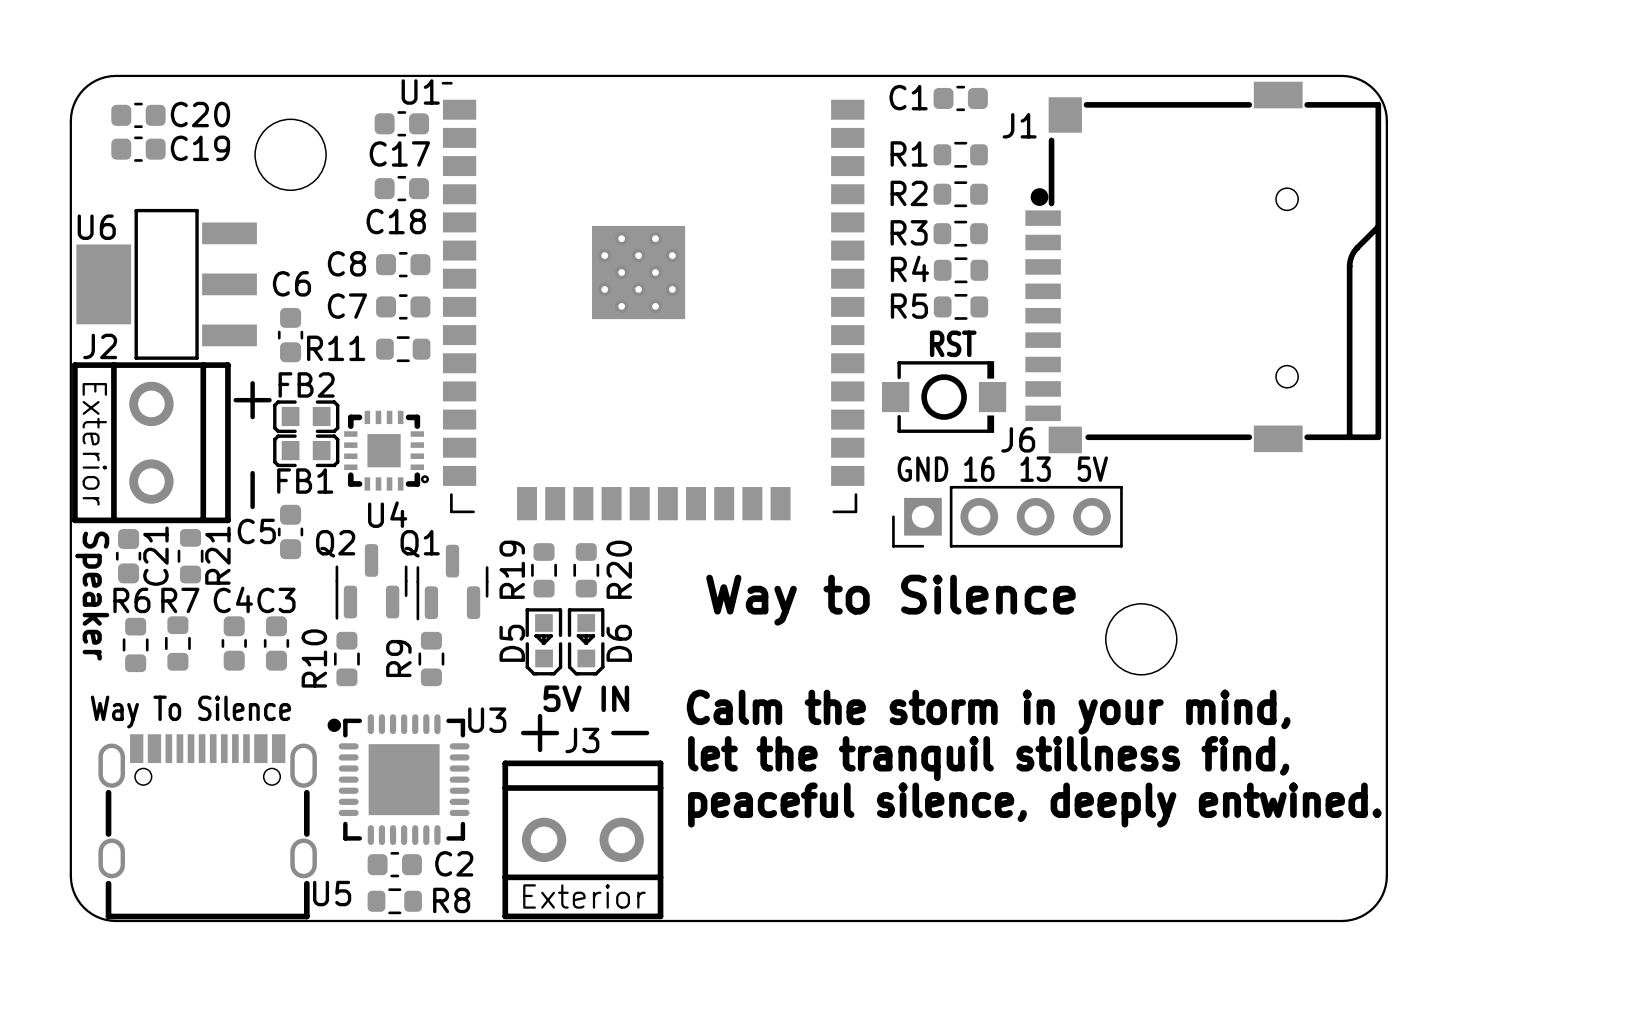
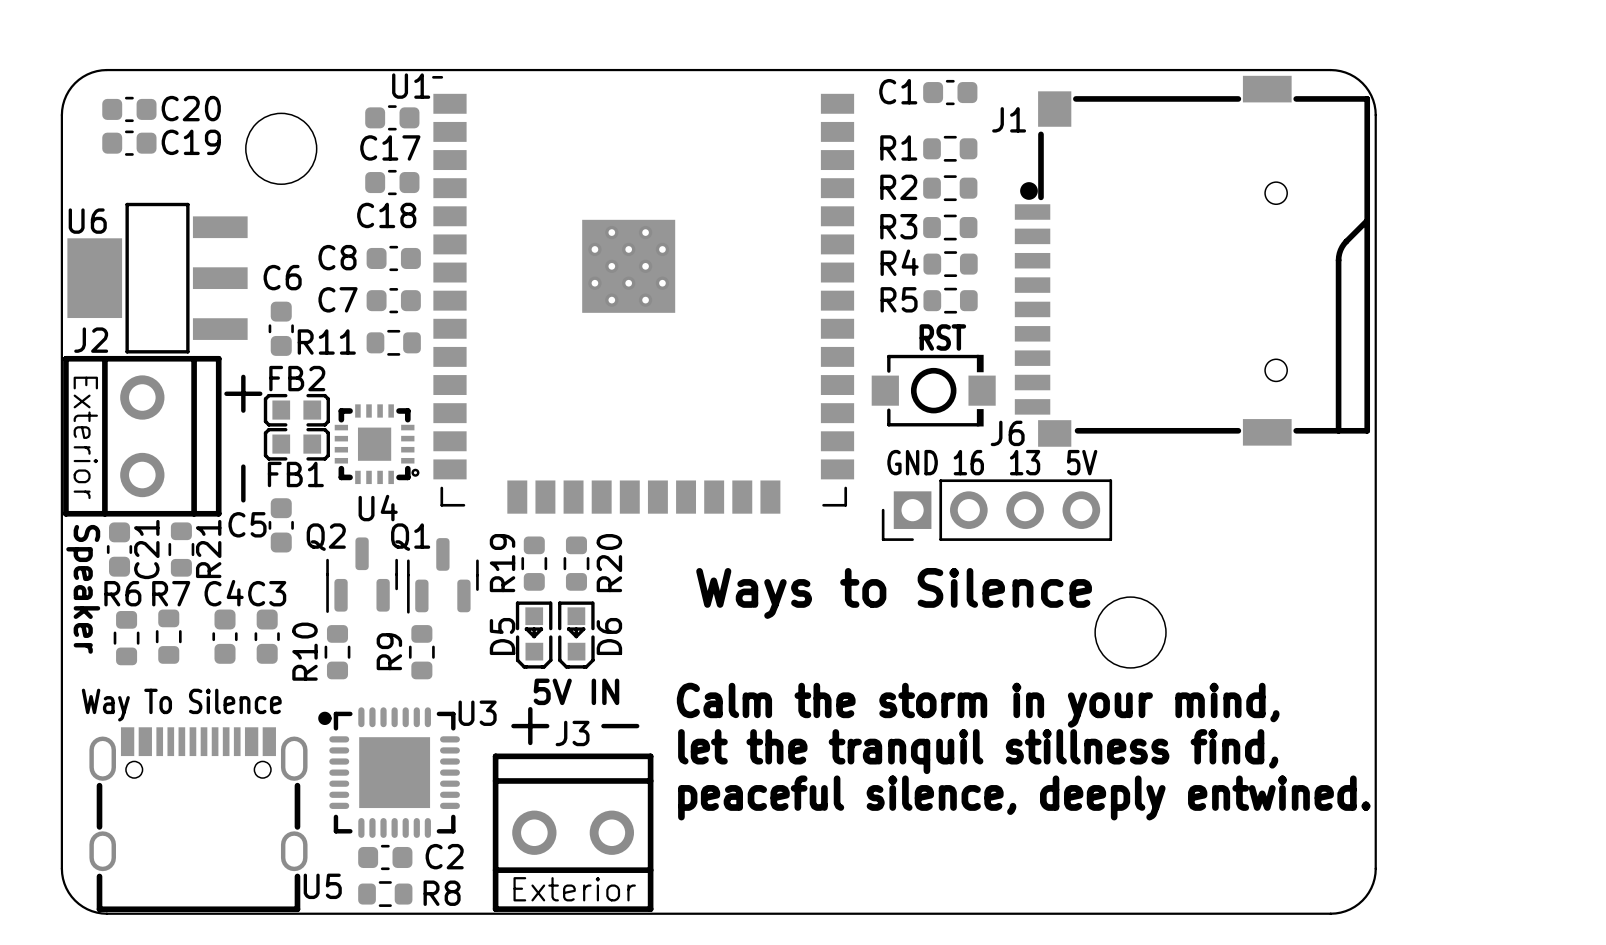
text: Way to Silence (890, 600) -> Ways to Silence (894, 593)

